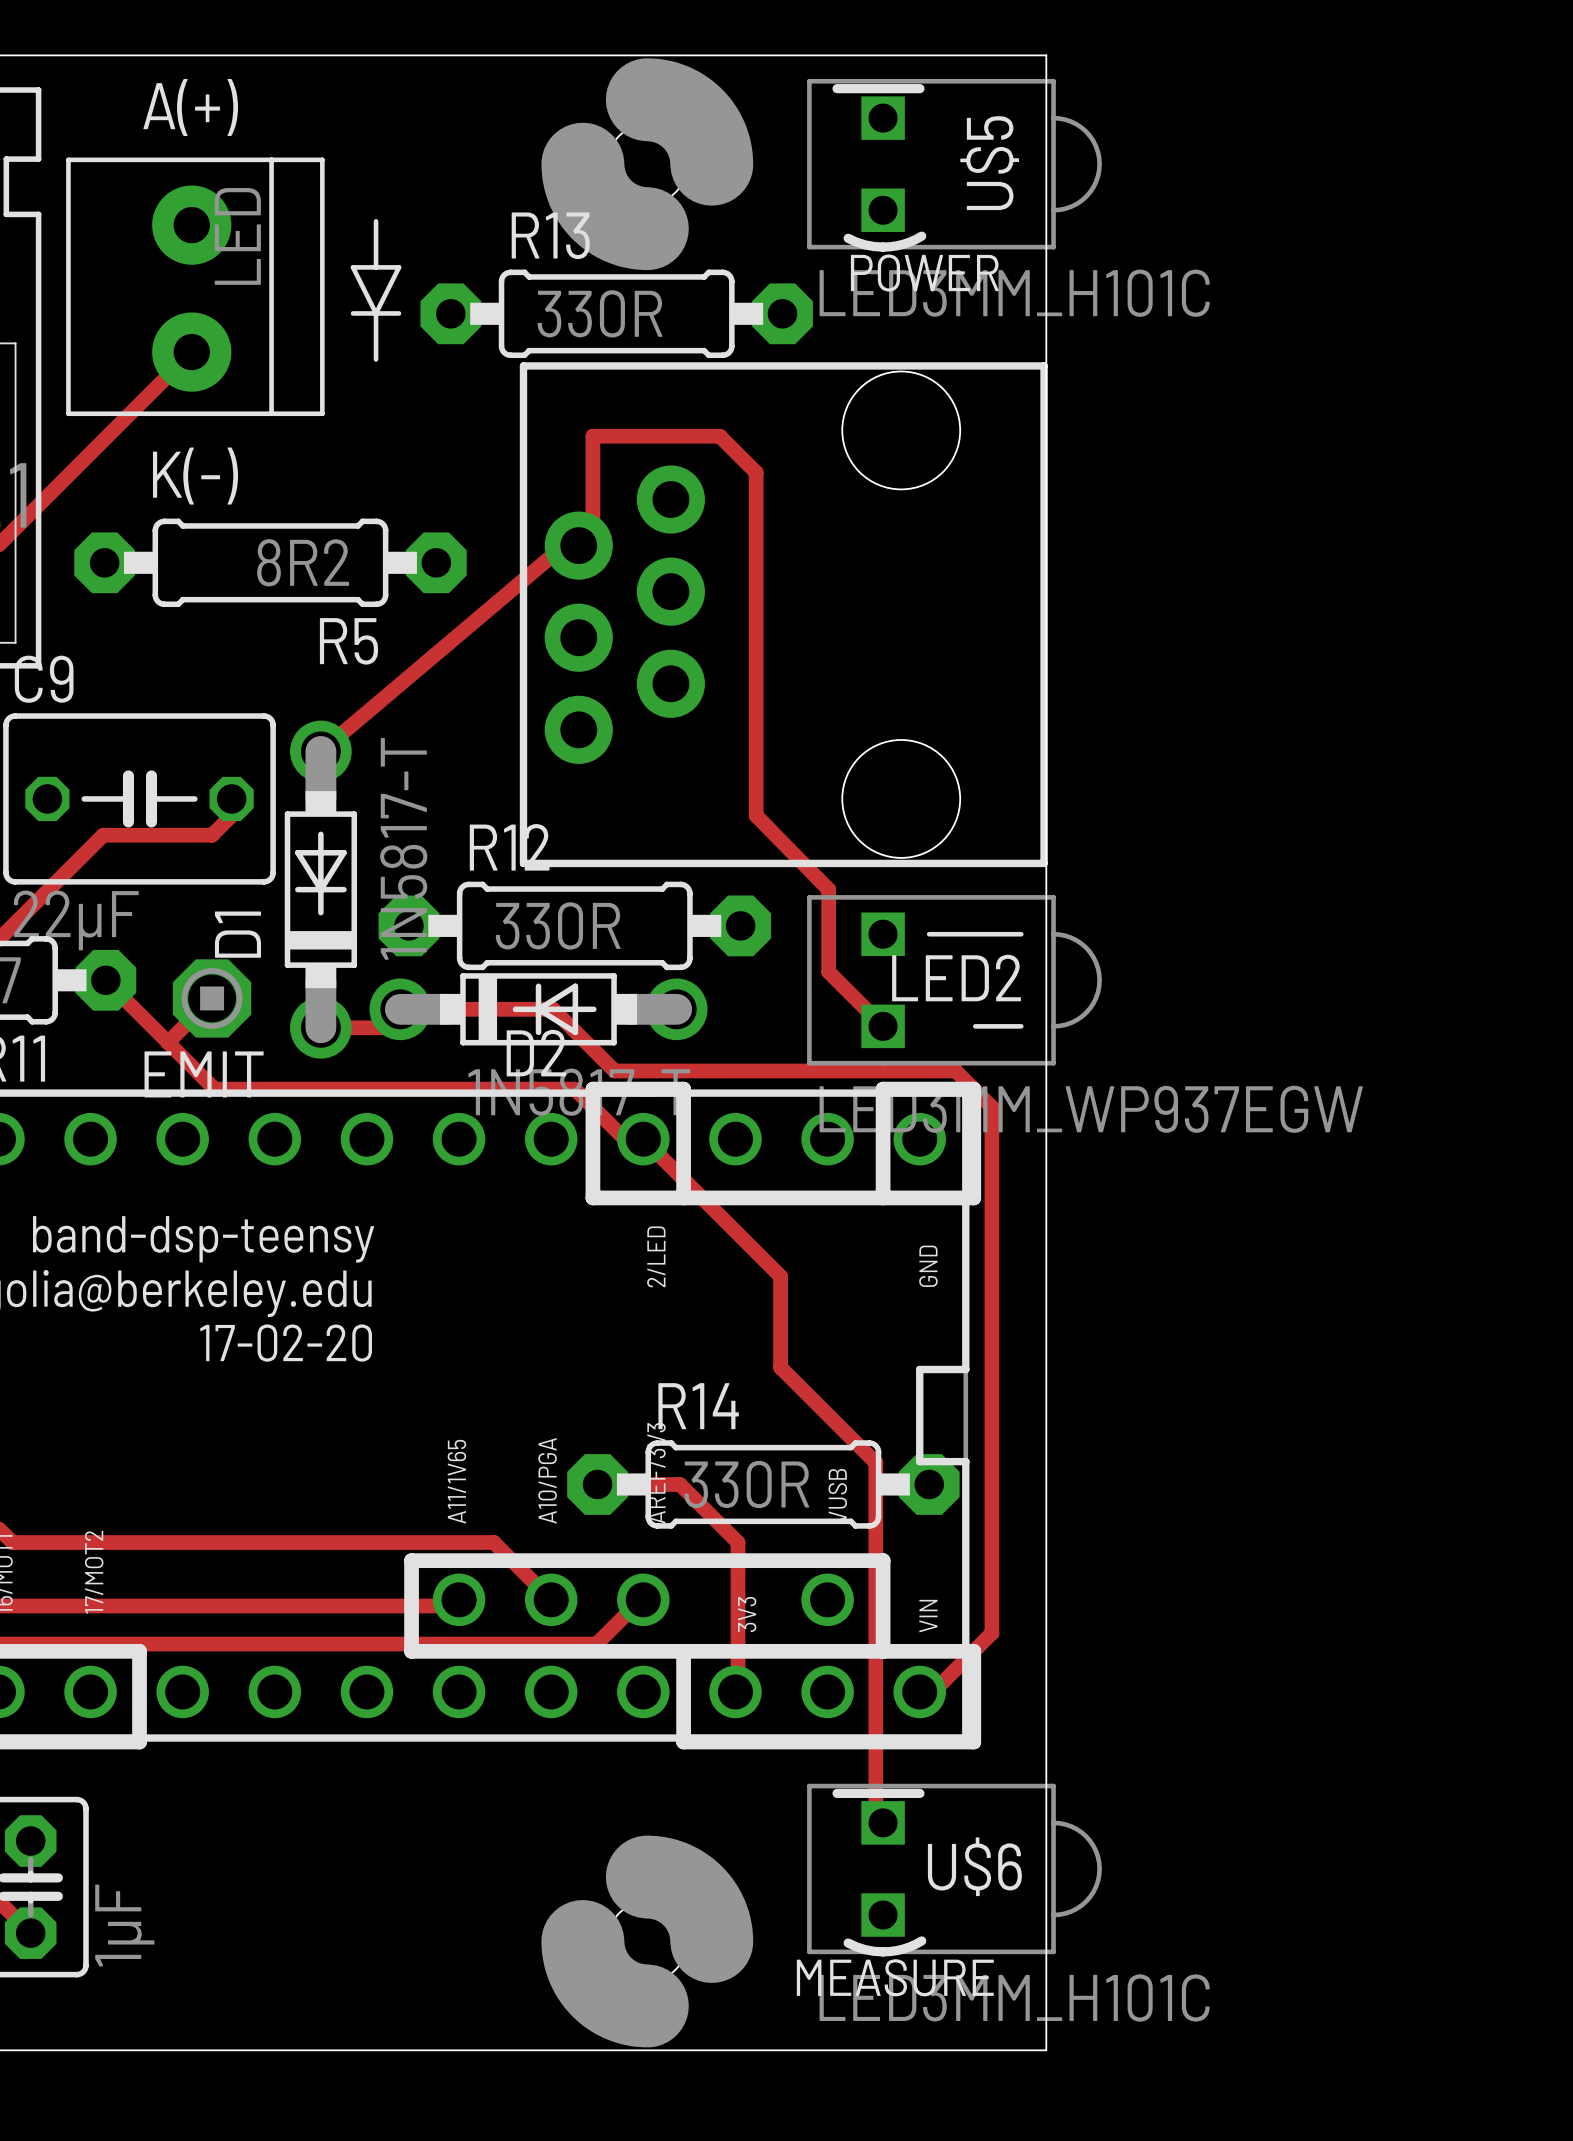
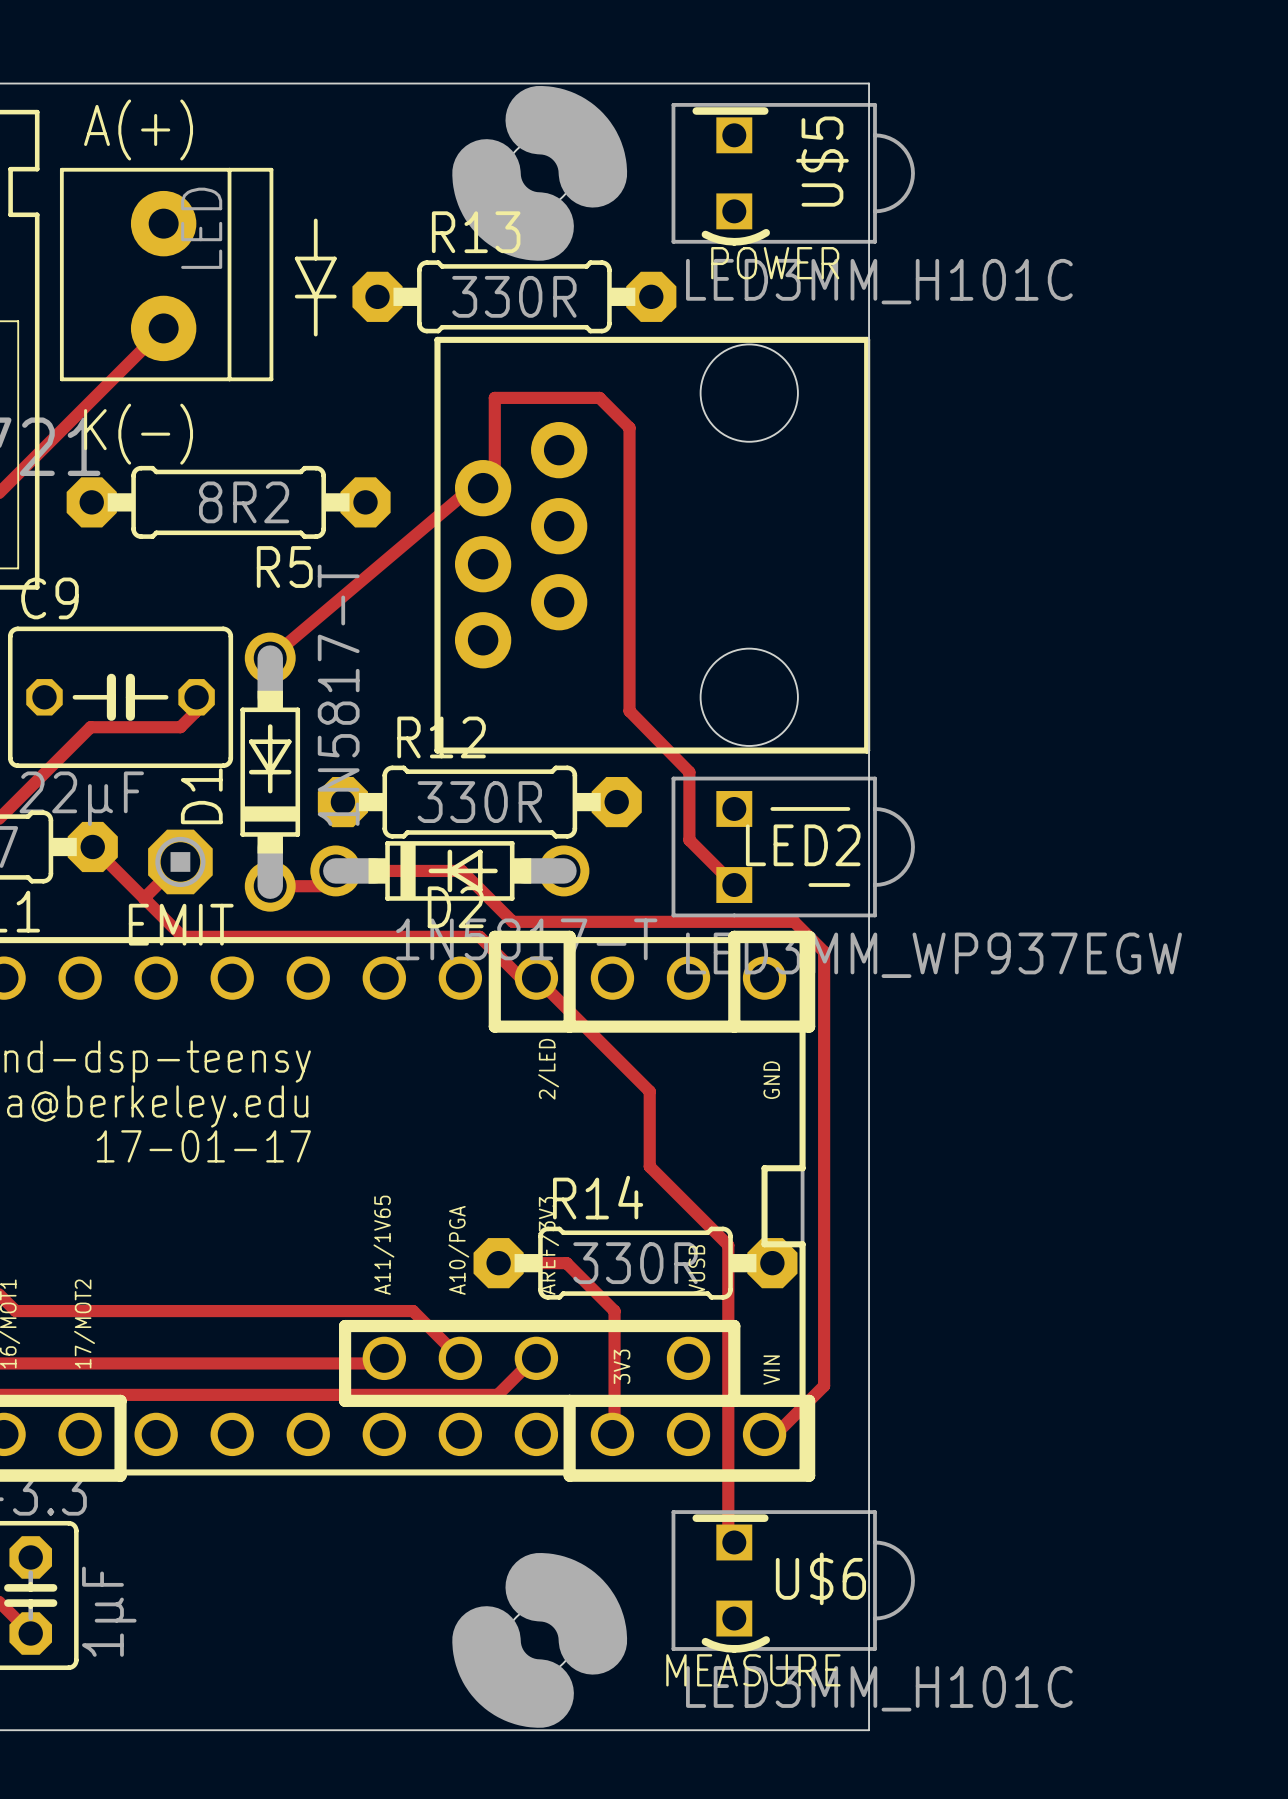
text: 17-02-20 (286, 1343) -> 17-01-17 (203, 1146)

